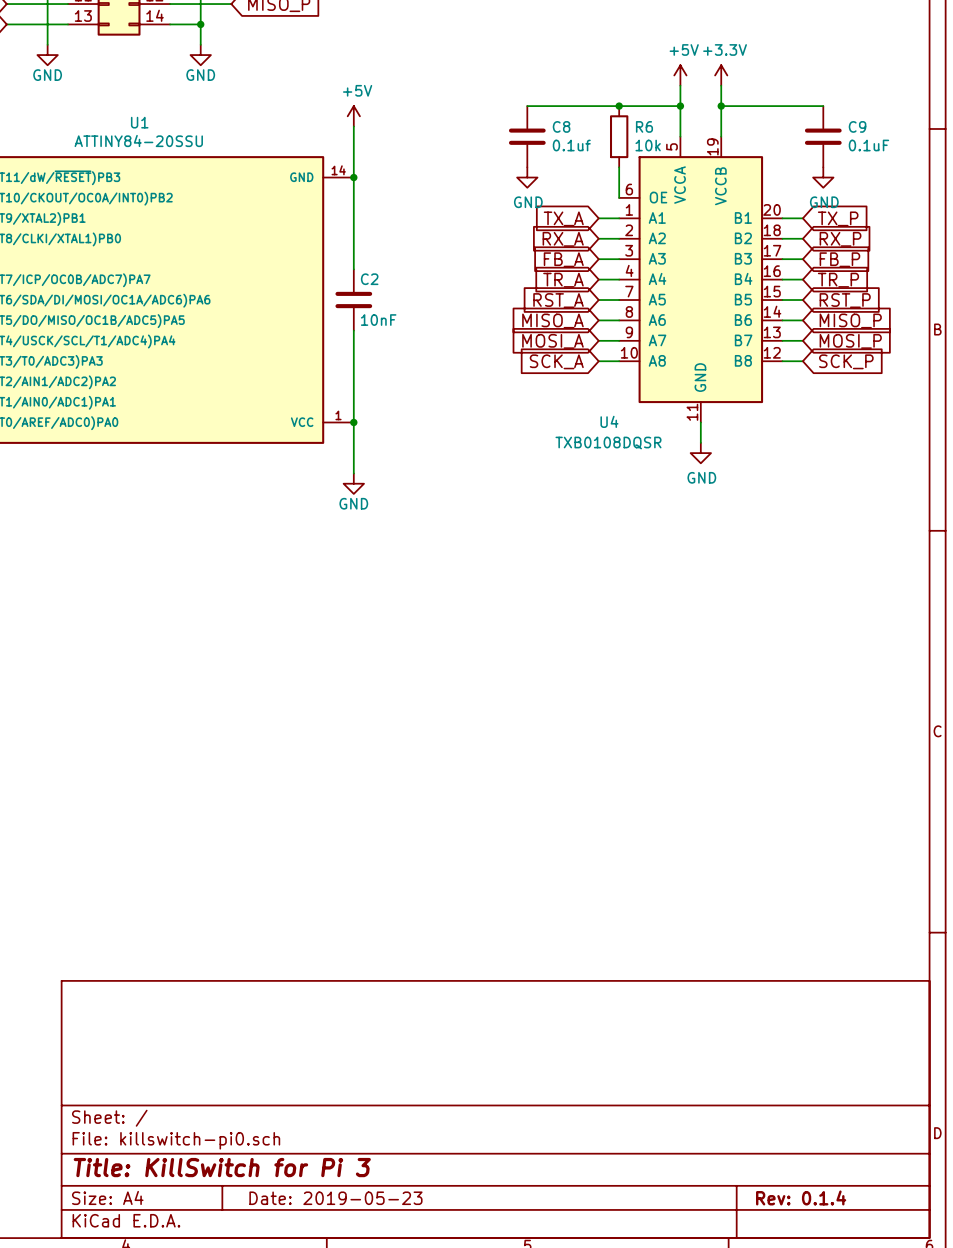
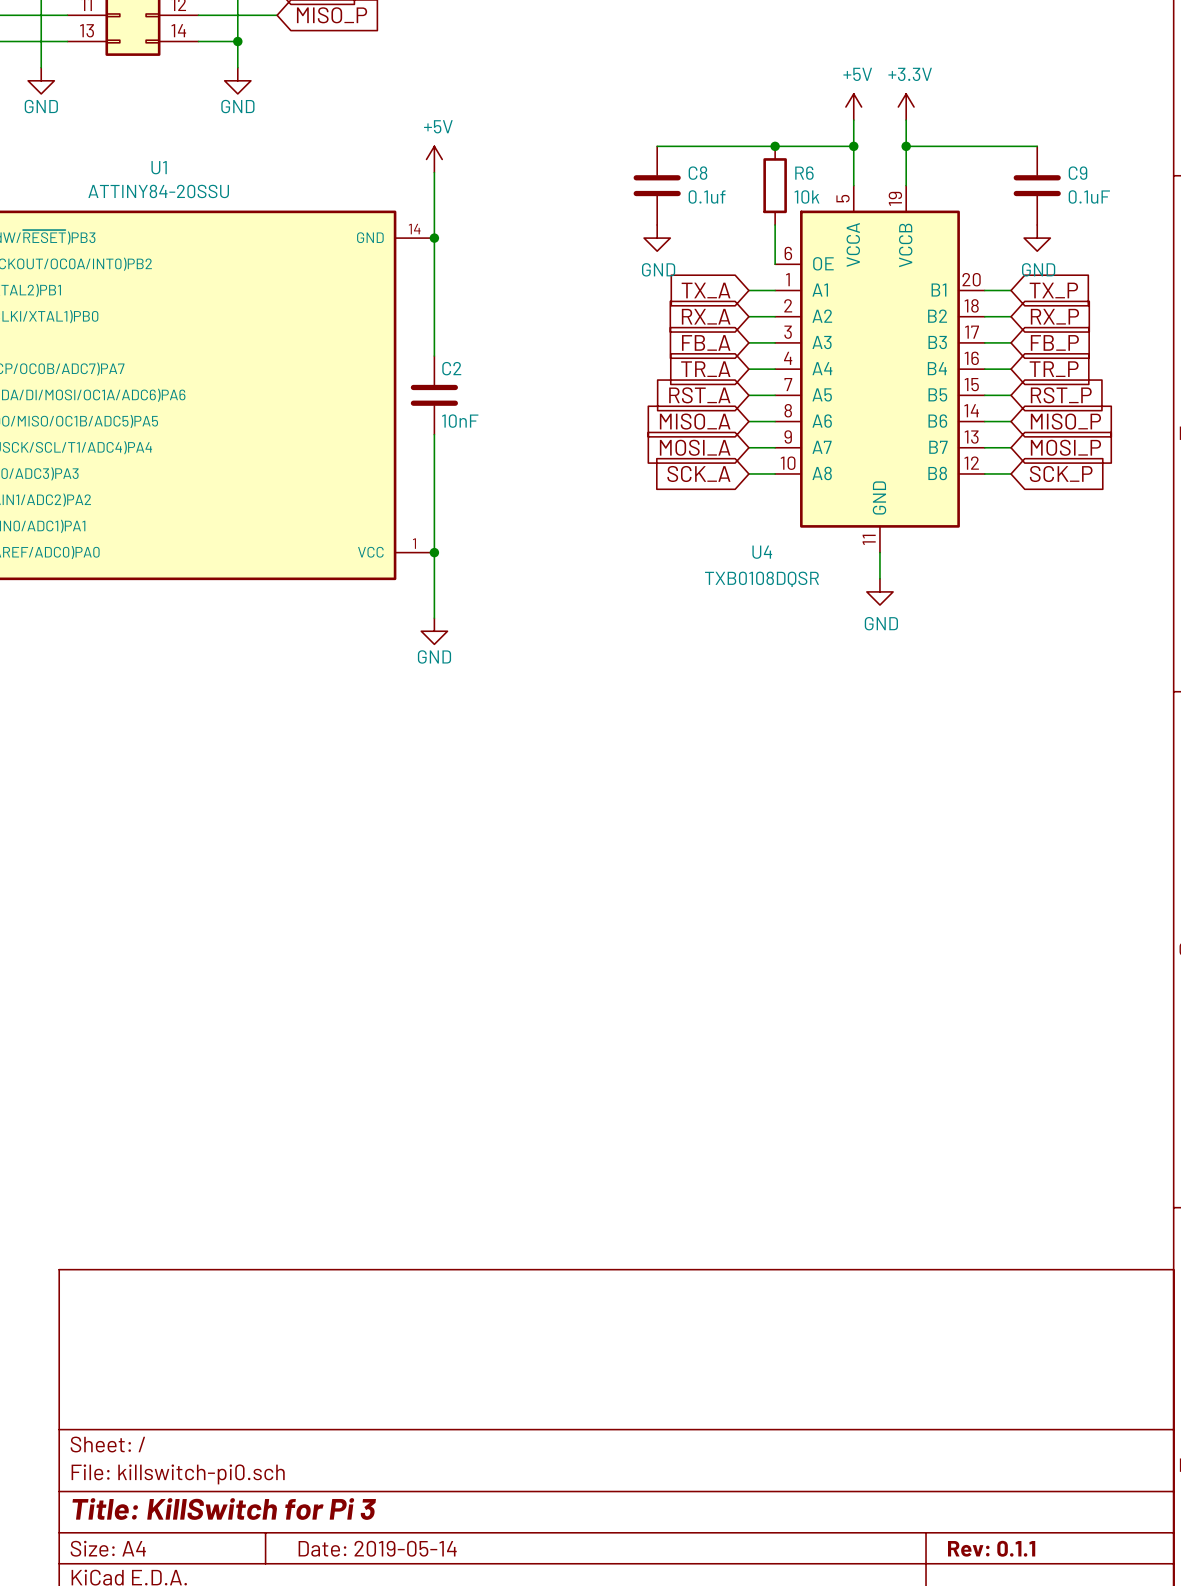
title block: Rev: 0.1.4 (801, 1197) -> Rev: 0.1.1 (991, 1548)
title block: Date: 2019-05-23 (335, 1198) -> Date: 2019-05-14 (377, 1548)

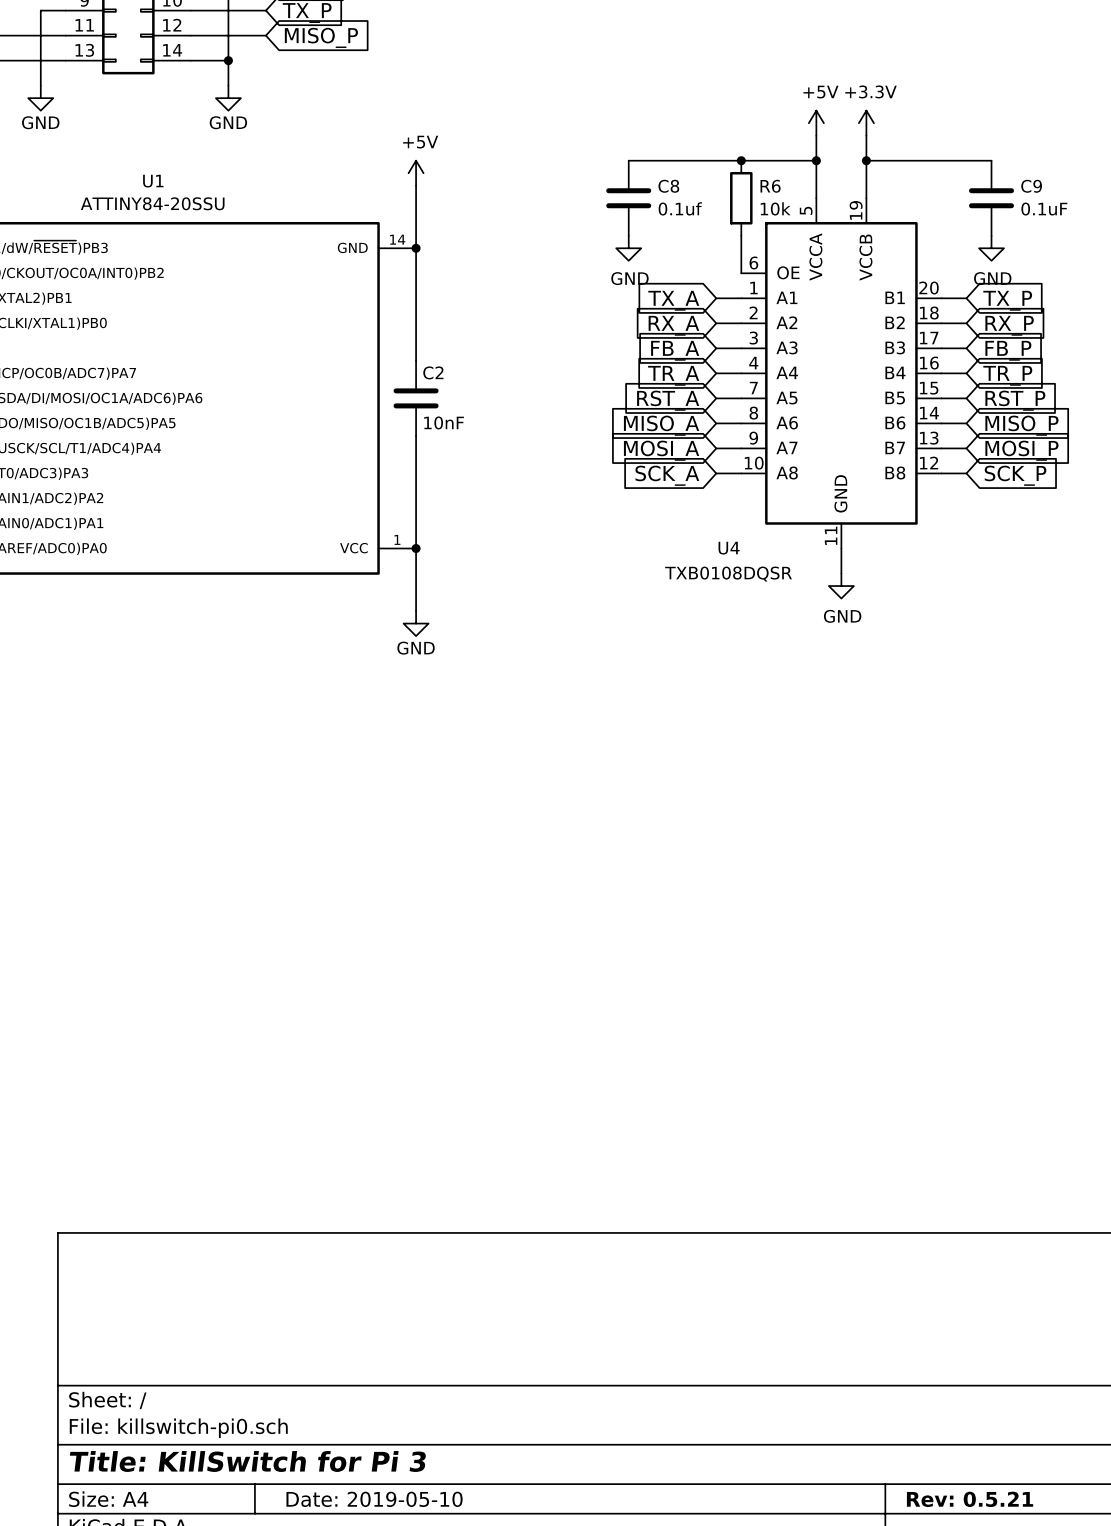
title block: Date: 2019-05-14 (377, 1548) -> Date: 2019-05-10 (374, 1499)
title block: Rev: 0.1.1 (991, 1548) -> Rev: 0.5.21 (970, 1499)

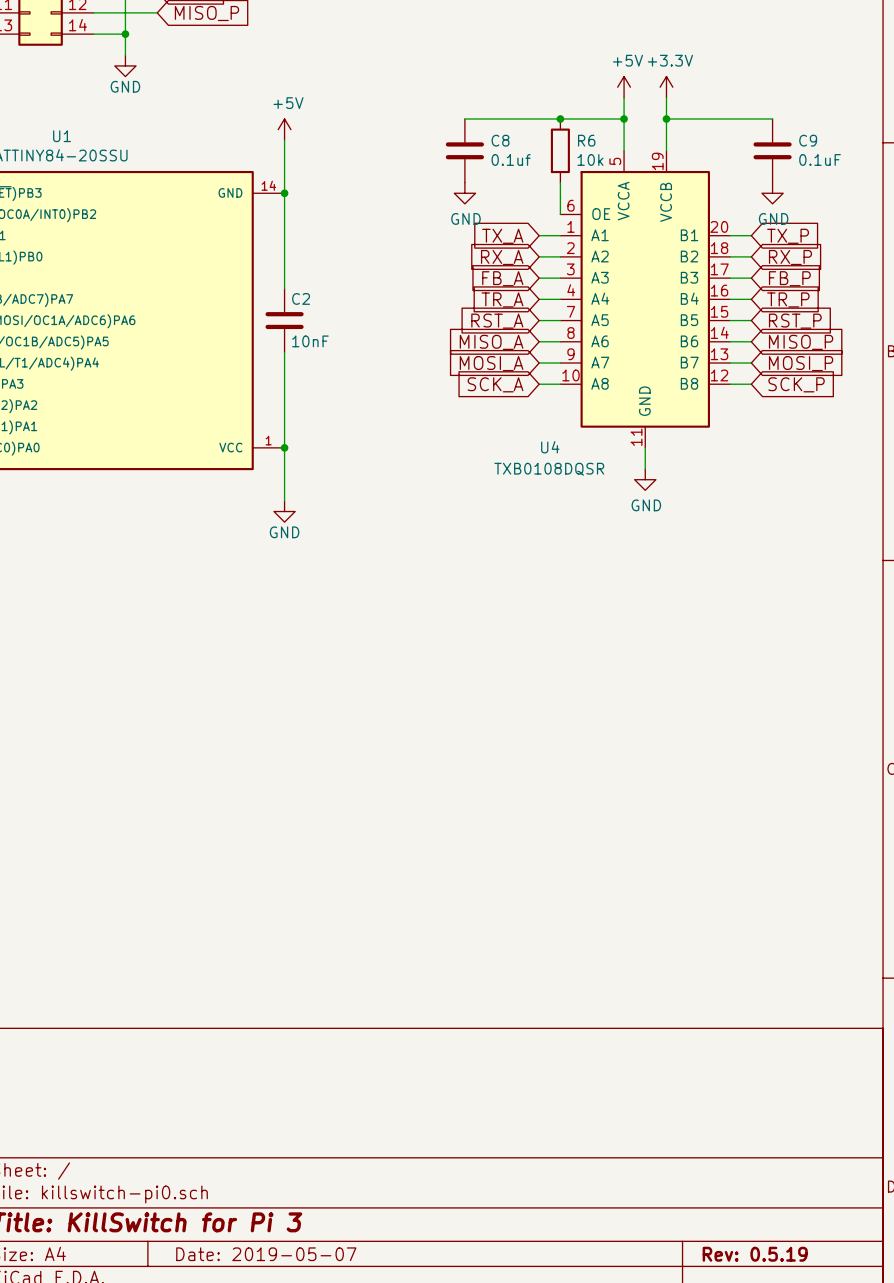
title block: Date: 2019-05-10 (374, 1499) -> Date: 2019-05-07 (266, 1254)
title block: Rev: 0.5.21 (970, 1499) -> Rev: 0.5.19 (755, 1254)

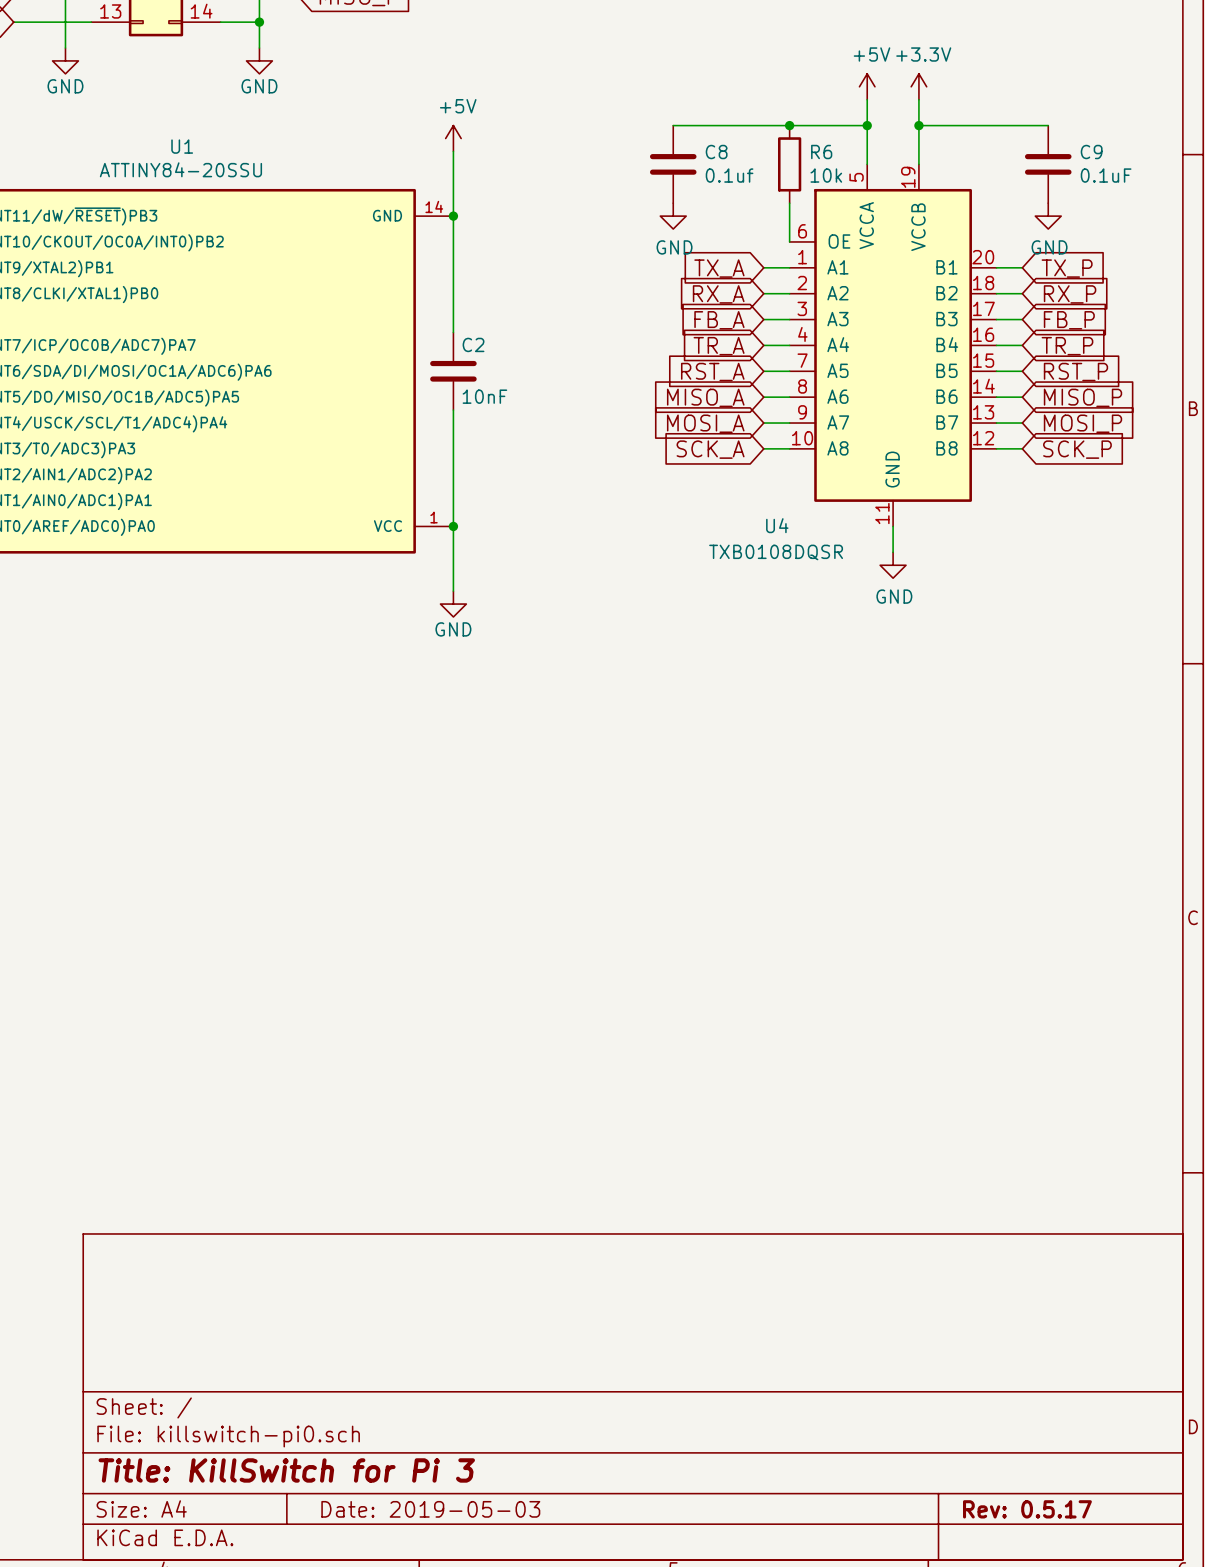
title block: Date: 2019-05-07 (266, 1254) -> Date: 2019-05-03 (430, 1509)
title block: Rev: 0.5.19 (755, 1254) -> Rev: 0.5.17 (1027, 1509)

